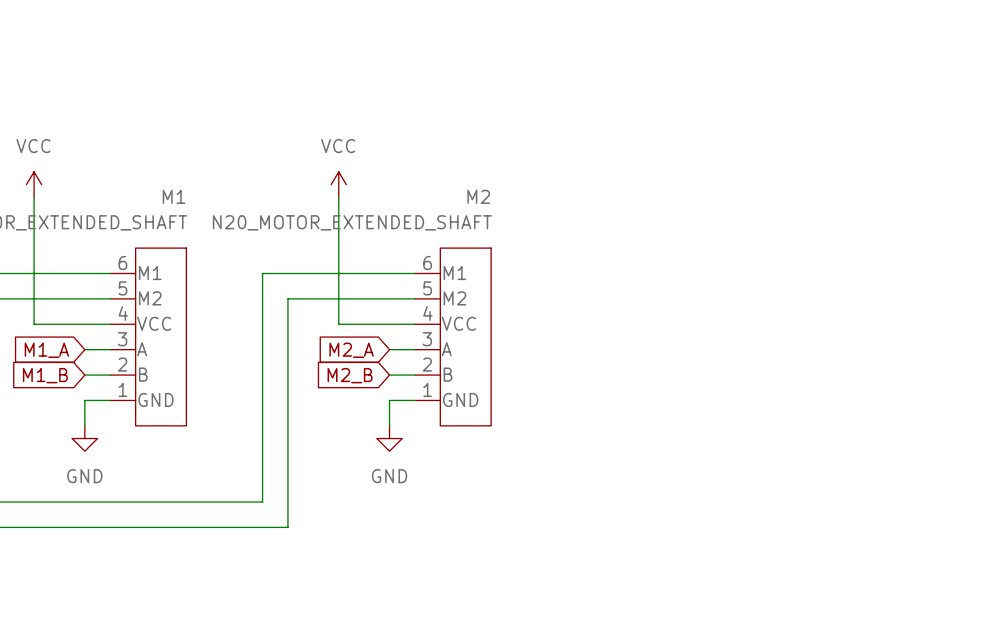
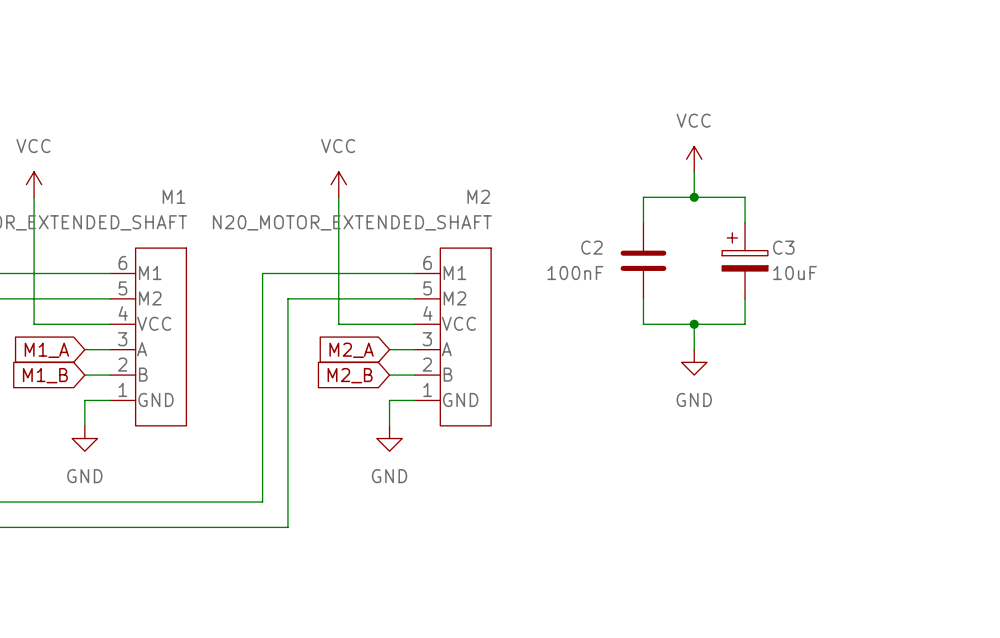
power symbol: none -> VCC (694, 159)
wire: none -> (694, 171) (694, 197)
junction: none -> (694, 197)
wire: none -> (643, 222) (643, 197) (745, 197) (745, 222)
C2: none -> 100nF (643, 260)
C3: none -> 10uF (745, 260)
wire: none -> (643, 298) (643, 324) (745, 324) (745, 298)
wire: none -> (694, 324) (694, 349)
junction: none -> (694, 324)
power symbol: none -> GND (694, 362)

